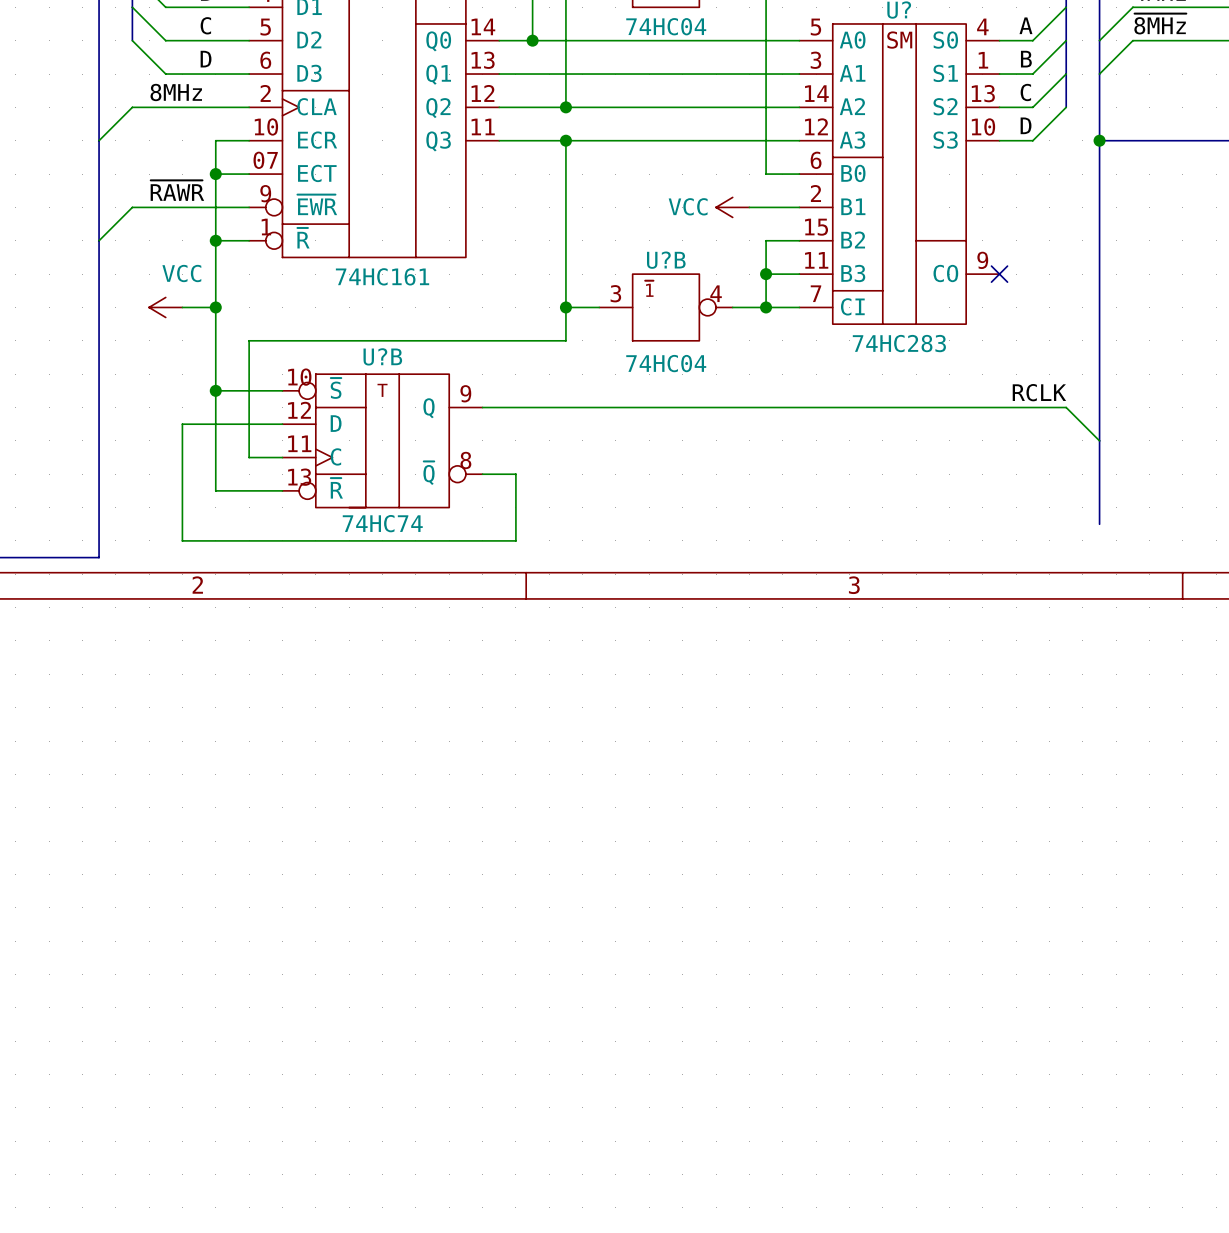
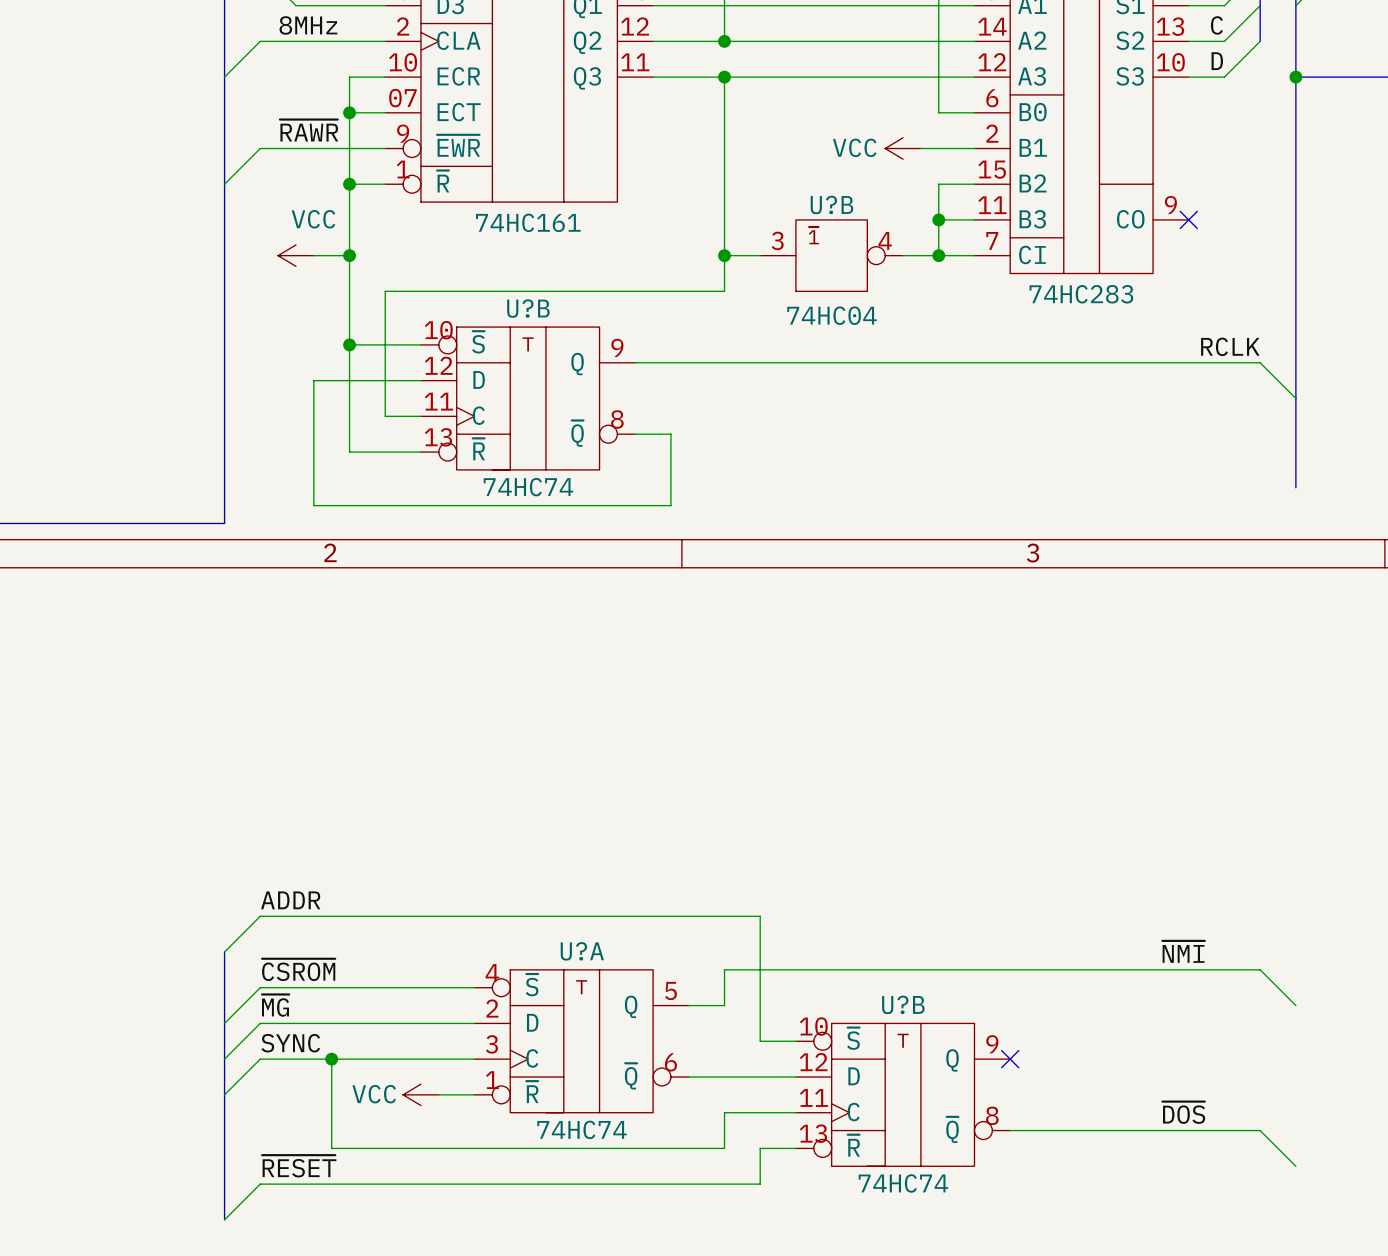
label: none -> ADDR (290, 900)
wire: none -> (224, 952) (260, 916) (760, 916) (760, 1041) (795, 1041)
bus: none -> (224, 952) (224, 1219)
label: none -> ~{NMI} (1183, 951)
label: none -> ~{CSROM} (298, 969)
wire: none -> (474, 987) (260, 987) (224, 1023)
label: none -> ~{MG} (275, 1005)
wire: none -> (688, 1005) (724, 1005) (724, 969) (1260, 969) (1295, 1005)
wire: none -> (474, 1023) (260, 1023) (224, 1059)
U?A: none -> 74HC74 (581, 1041)
label: none -> SYNC (290, 1043)
wire: none -> (331, 1059) (331, 1148) (724, 1148) (724, 1112) (795, 1112)
junction: none -> (331, 1059)
wire: none -> (474, 1059) (260, 1059) (224, 1094)
no-connect mark: none -> (1010, 1059)
wire: none -> (688, 1076) (795, 1076)
power symbol: none -> VCC (420, 1094)
wire: none -> (438, 1094) (474, 1094)
U?B: none -> 74HC74 (903, 1094)
label: none -> ~{DOS} (1183, 1112)
wire: none -> (1010, 1130) (1260, 1130) (1295, 1166)
wire: none -> (795, 1148) (760, 1148) (760, 1184) (260, 1184) (224, 1219)
label: none -> ~{RESET} (299, 1166)

